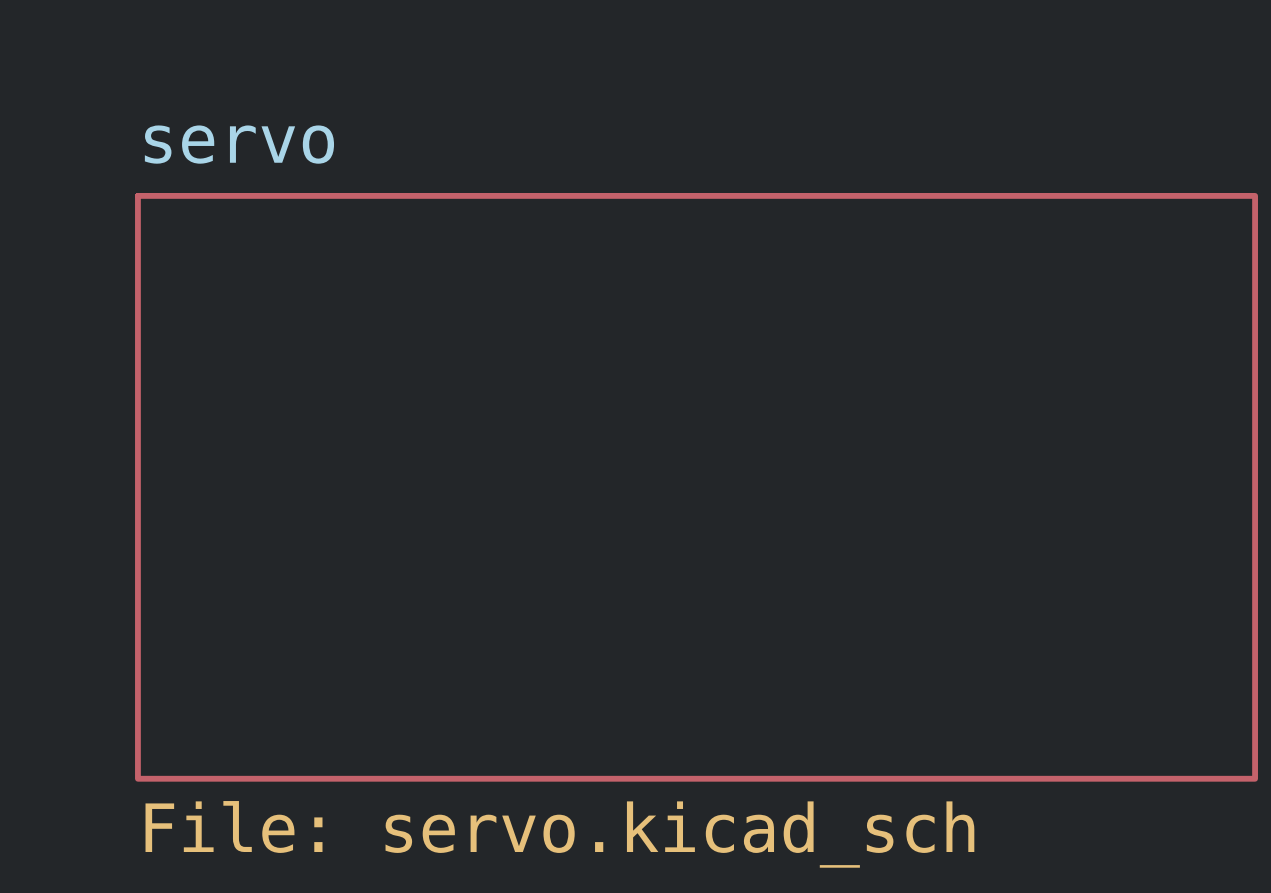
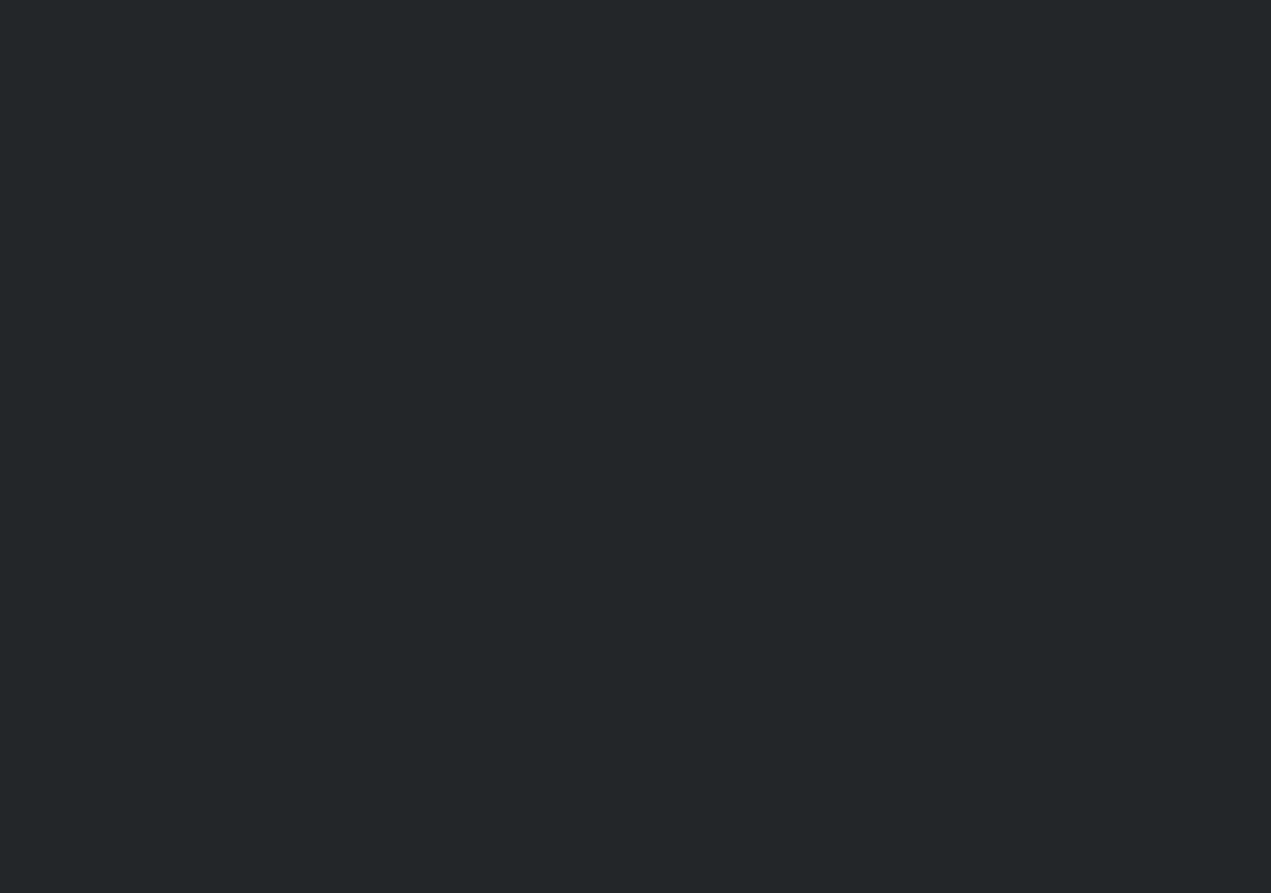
sheet servo: File: servo.kicad_sch (696, 487) -> none

